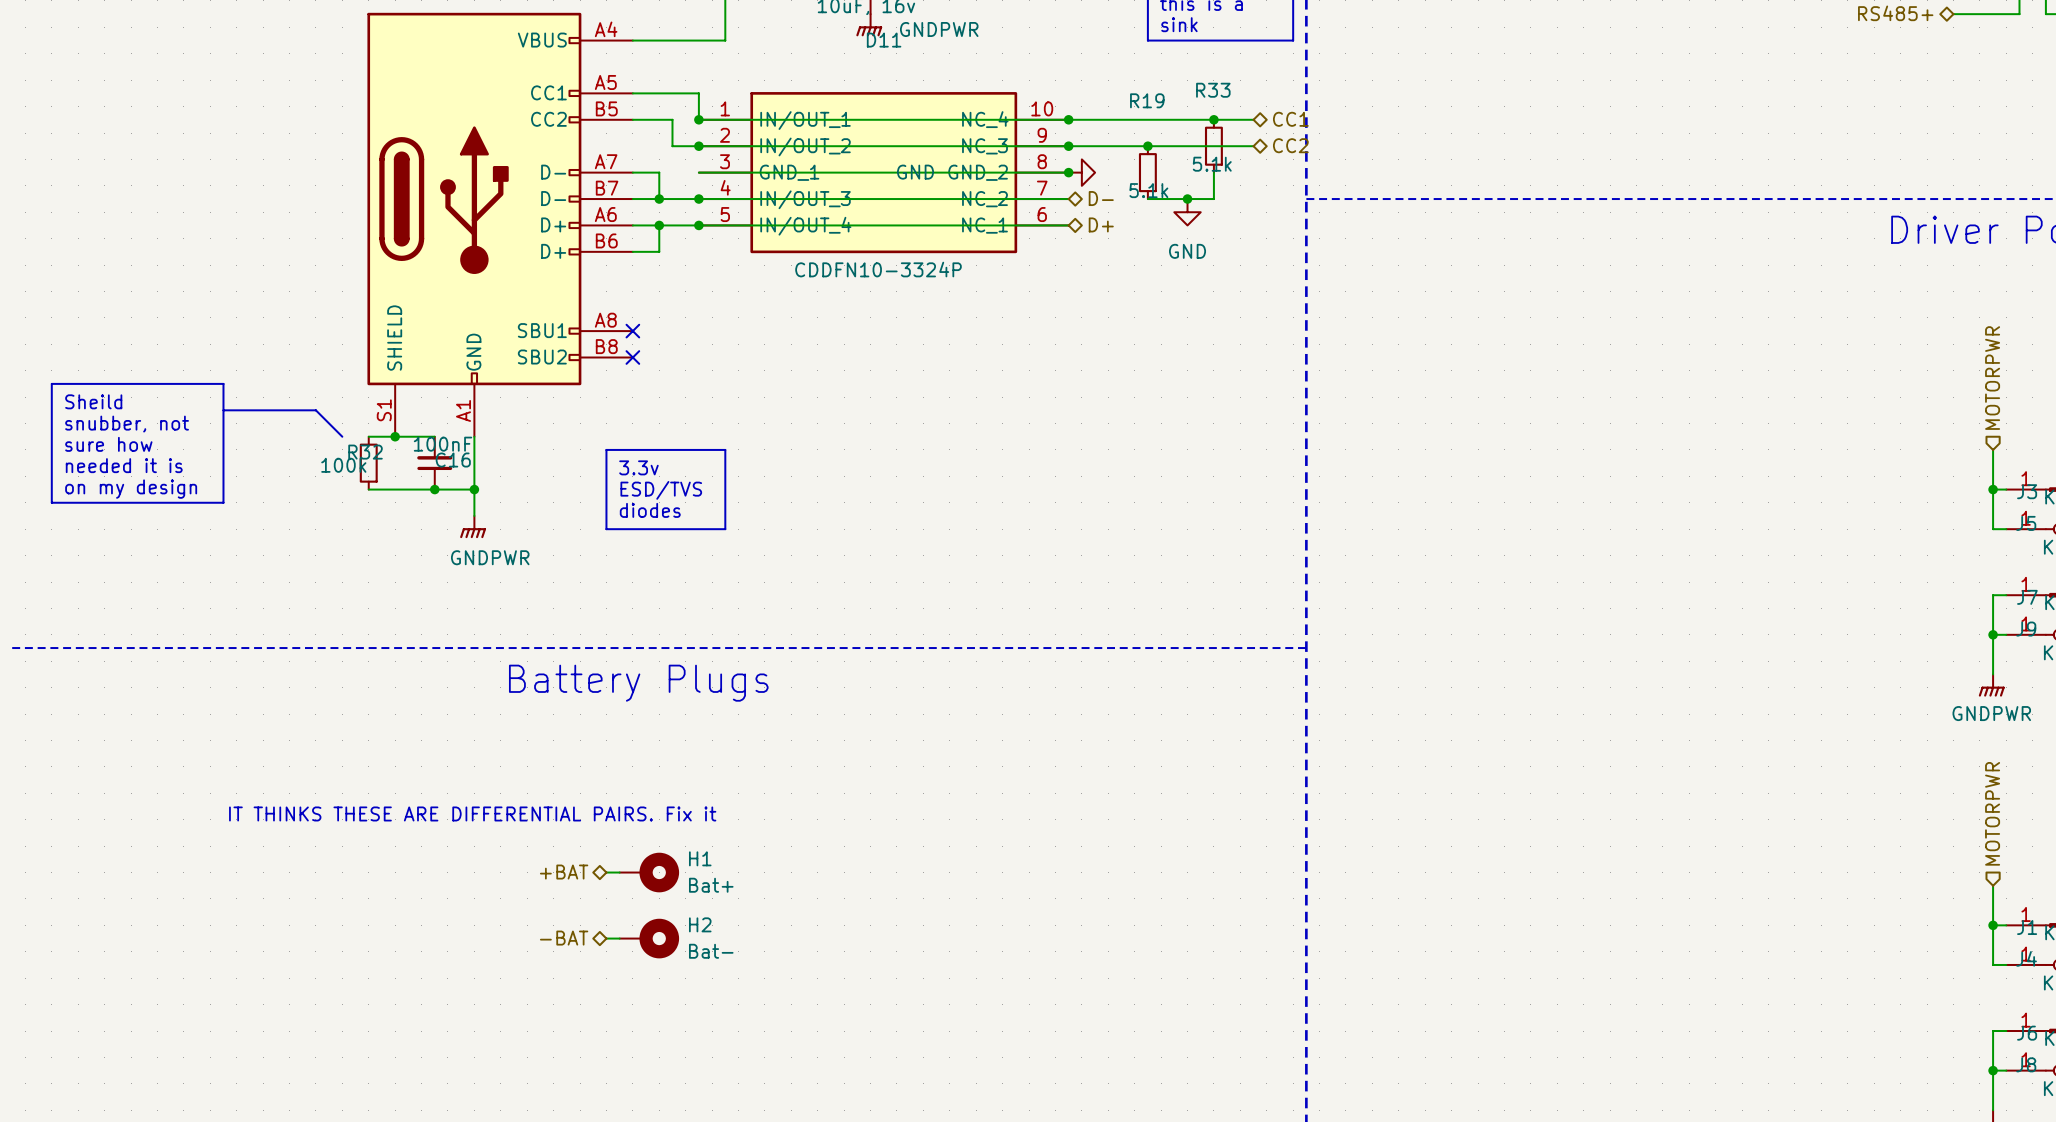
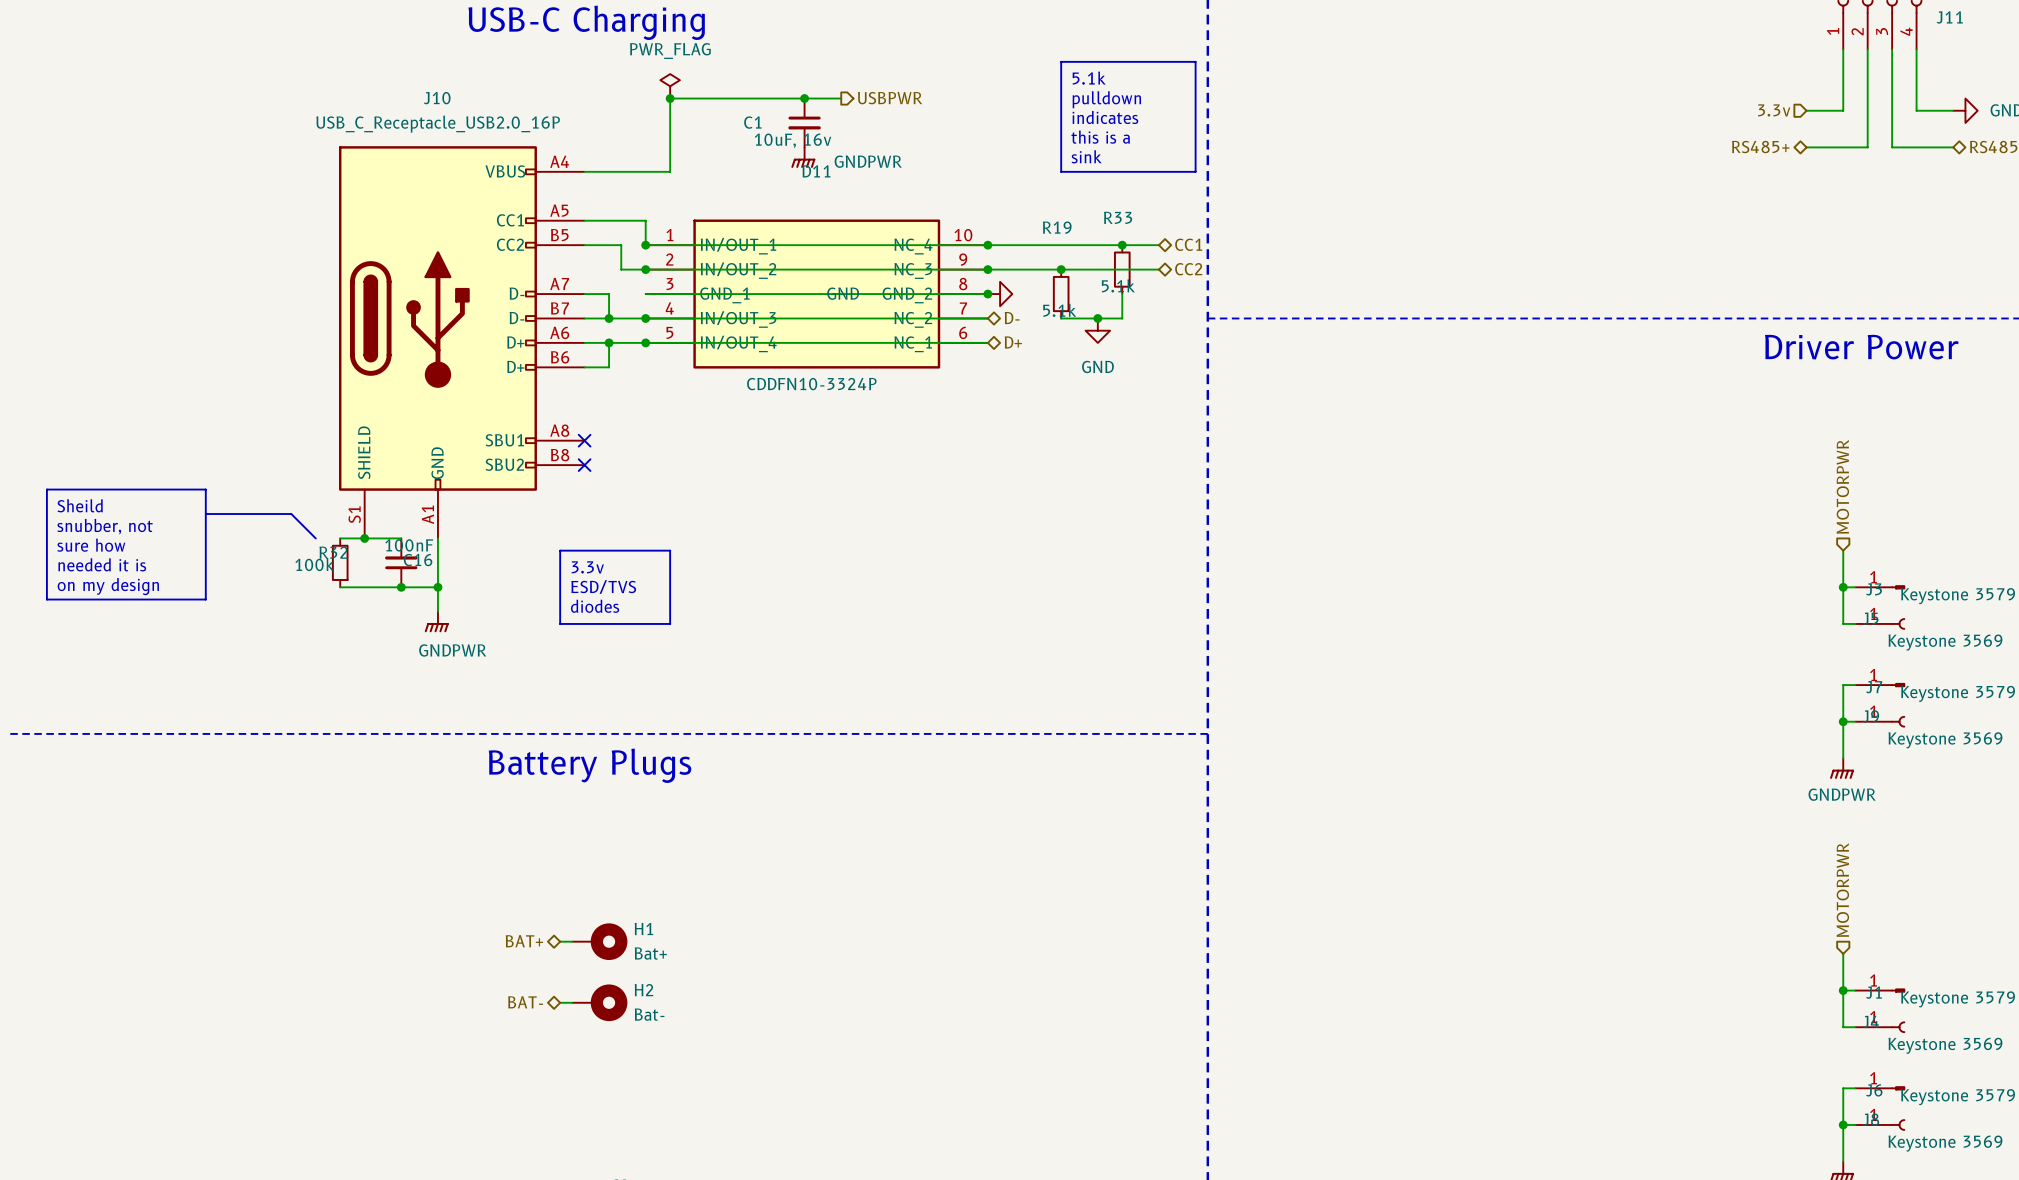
text: IT THINKS THESE ARE DIFFERENTIAL PAIRS. Fix it (472, 813) -> none
hierarchical label: +BAT (564, 872) -> BAT+ (524, 941)
hierarchical label: -BAT (564, 938) -> BAT- (525, 1002)

